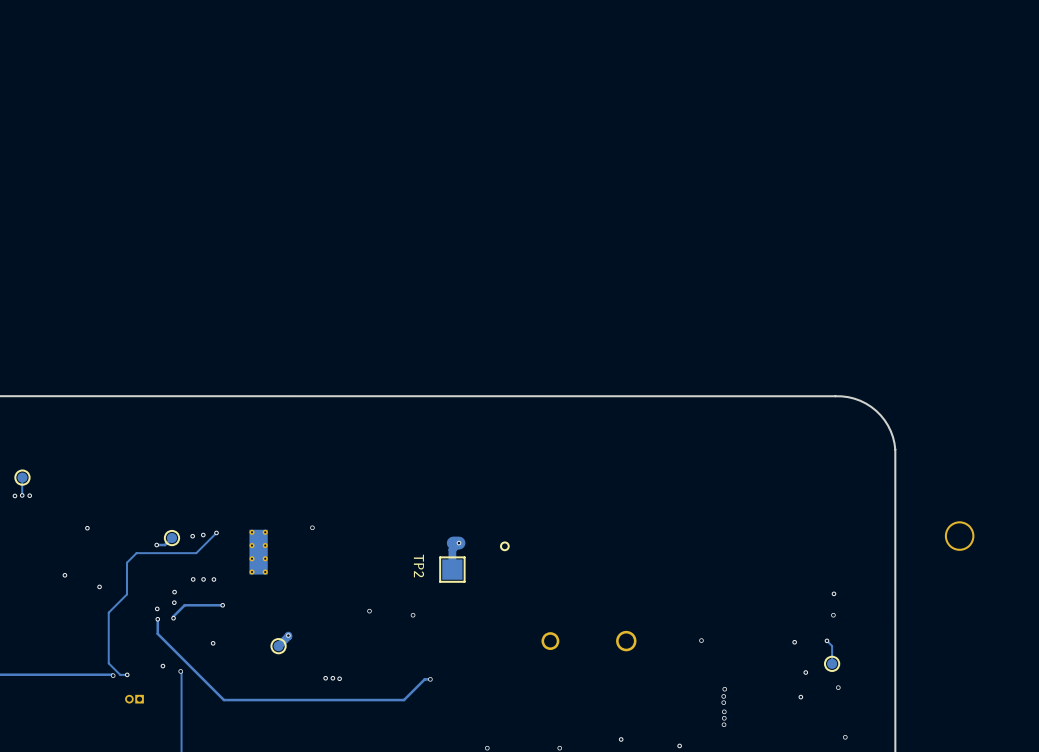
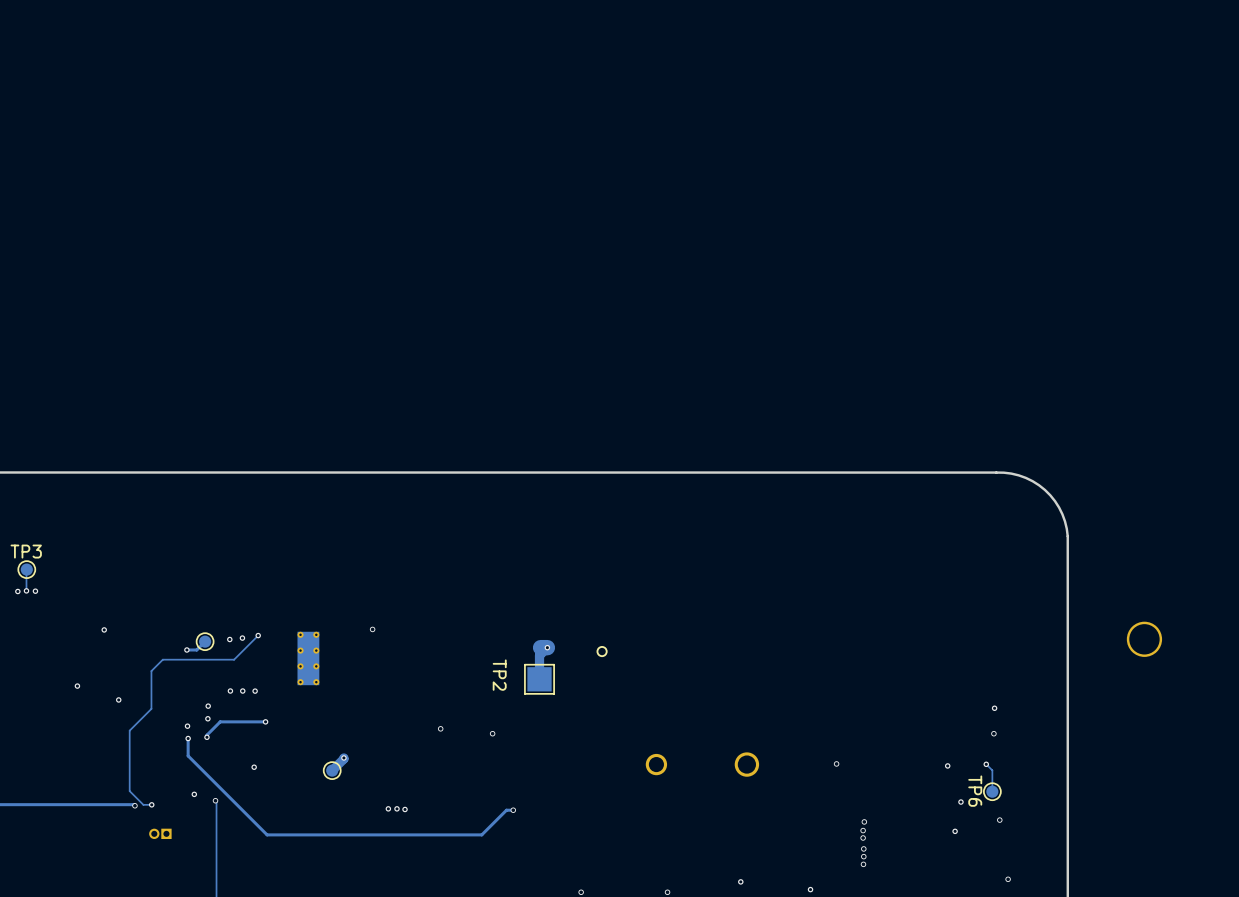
TP3 name: none -> TP3 (26, 551)
TP6 name: none -> TP6 (975, 791)

